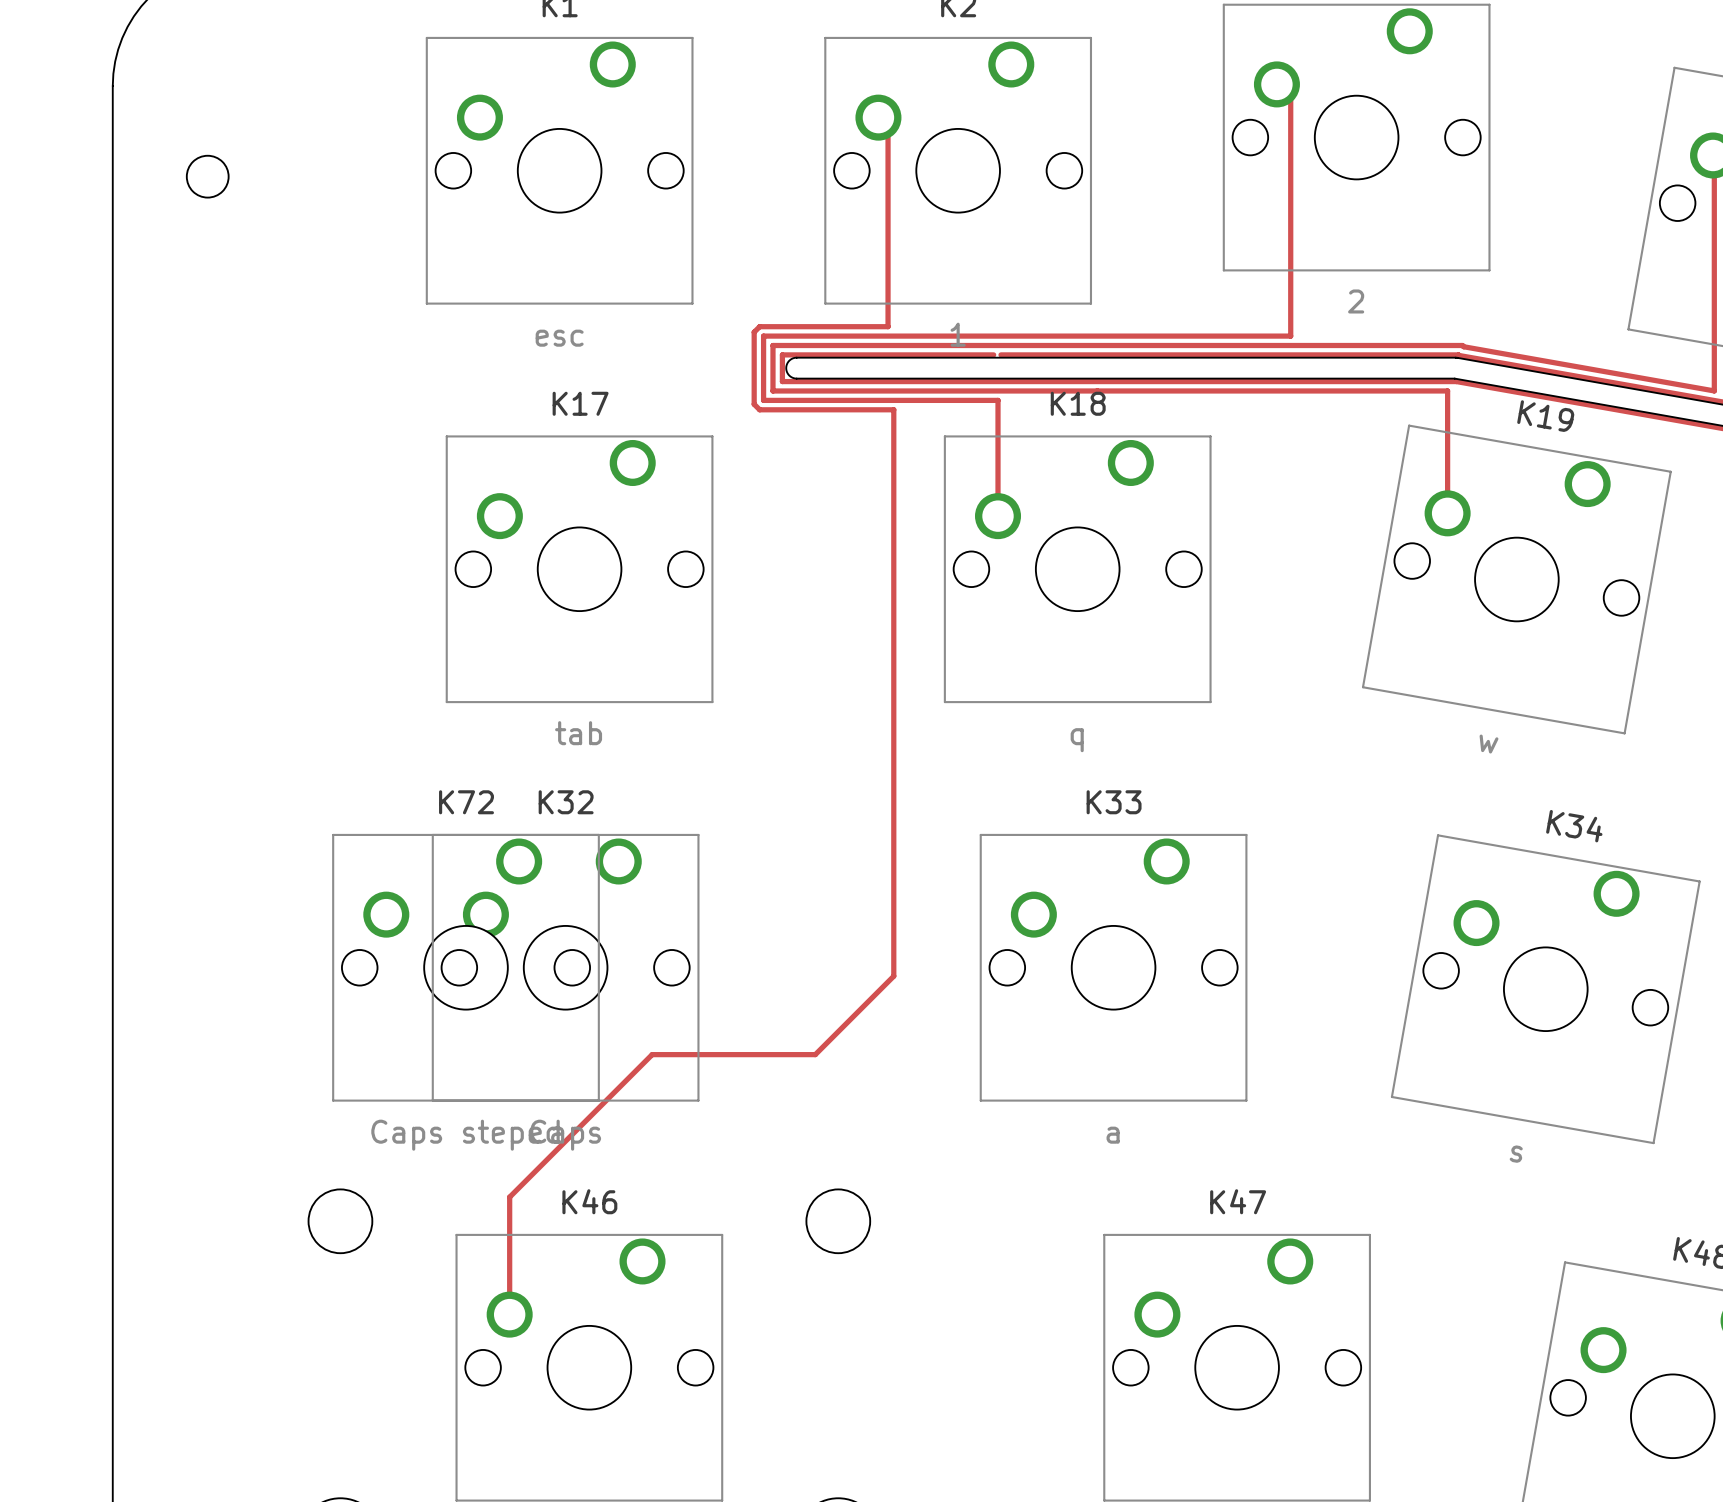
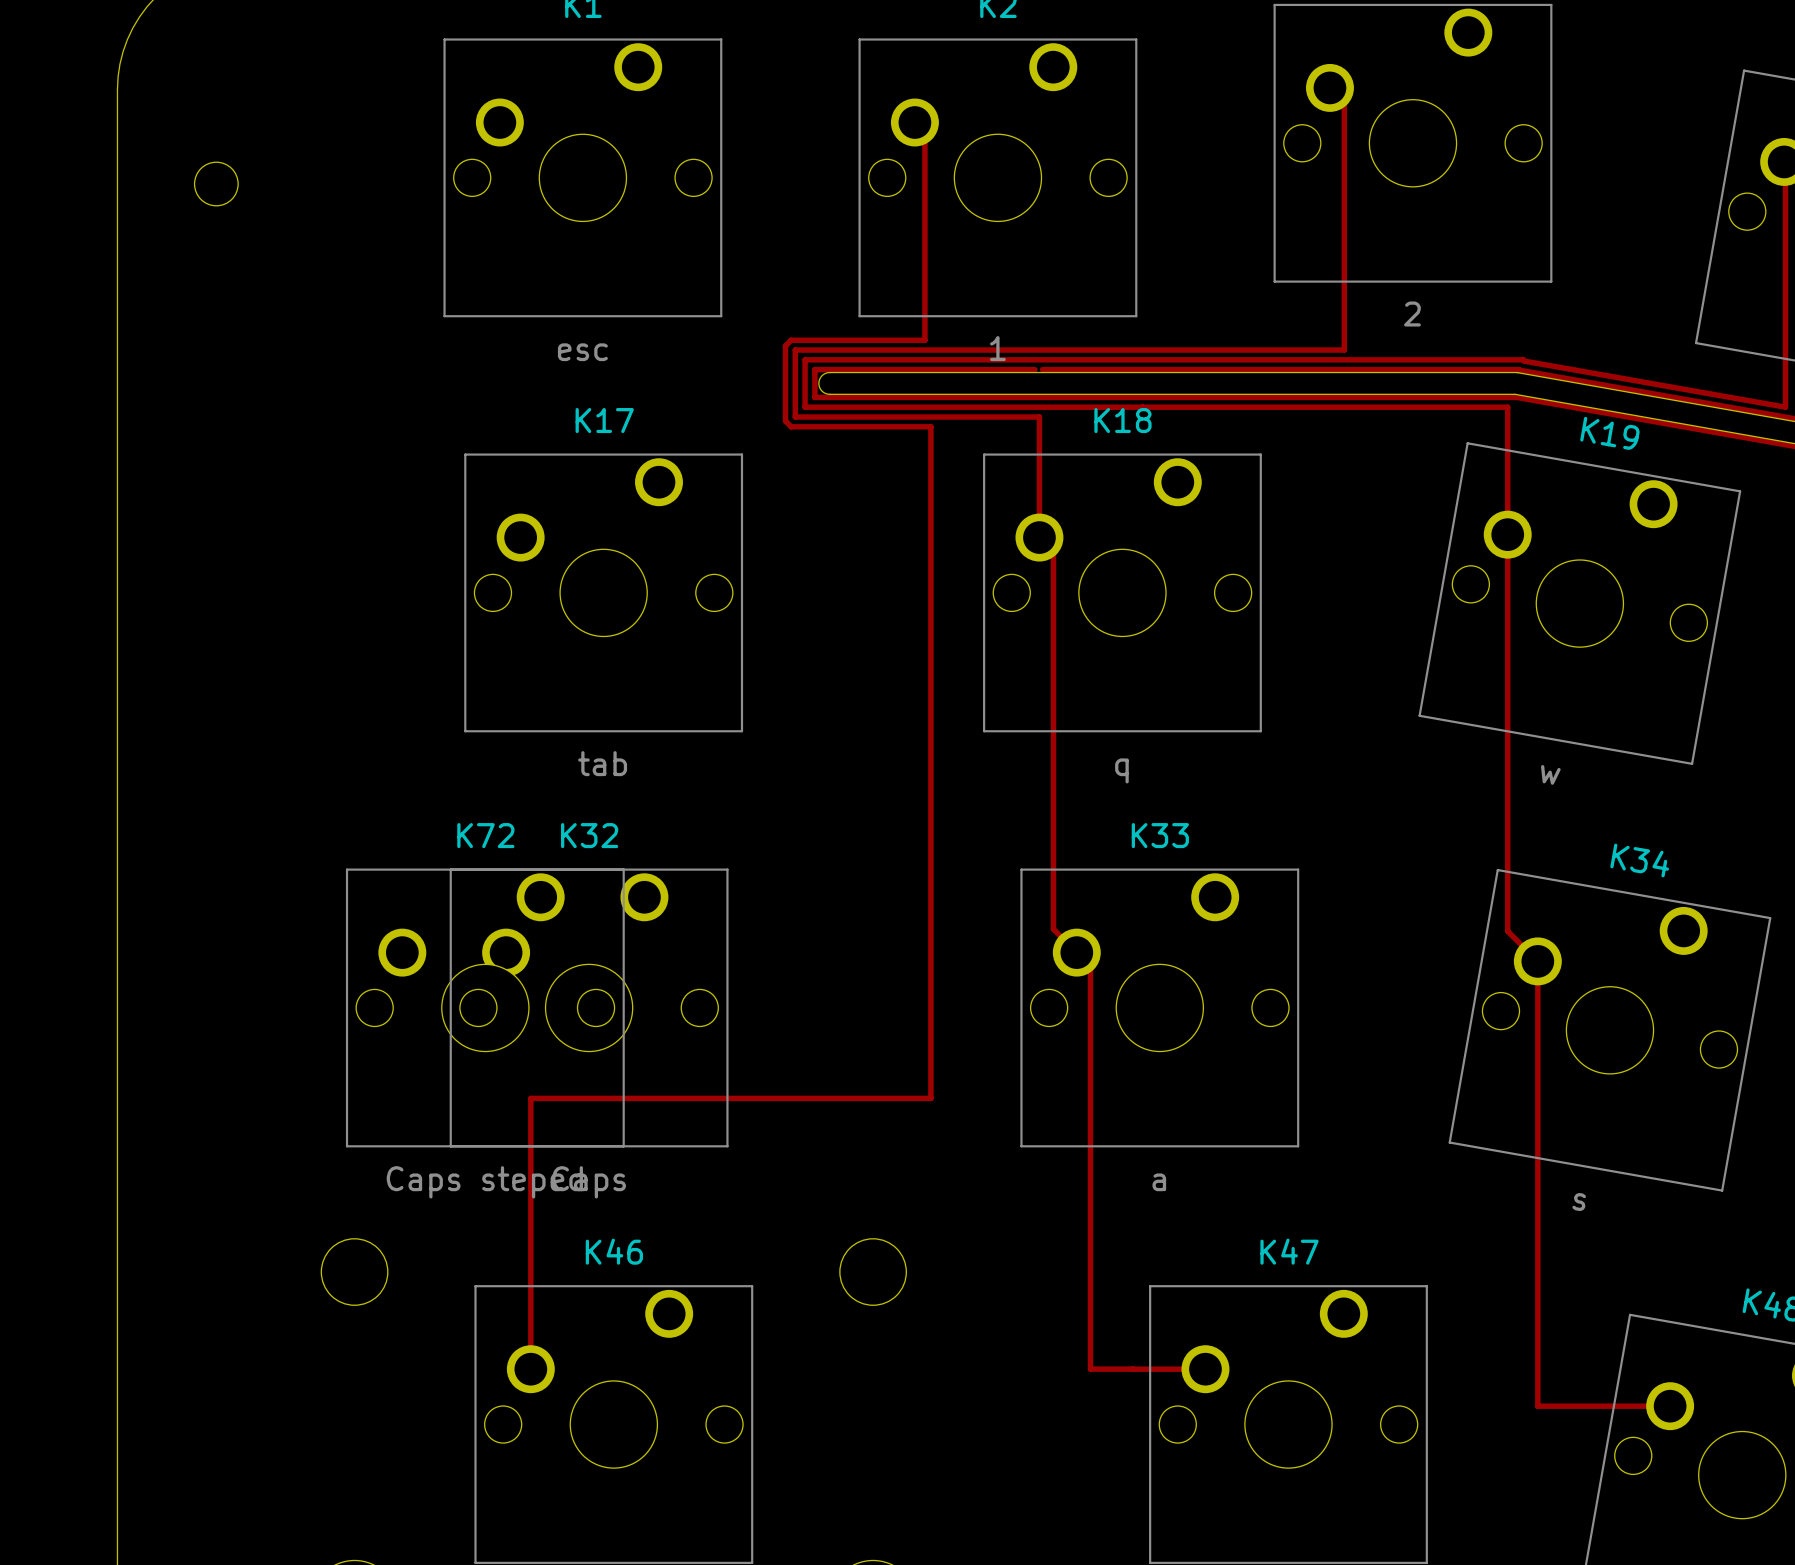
track: none -> (1507, 534) (1507, 931) (1537, 961) (1537, 1406) (1670, 1406) (1667, 1409)
track: none -> (1039, 537) (1053, 537) (1053, 929) (1076, 952) (1090, 952) (1090, 1369) (1205, 1369)
track: (893, 976) (815, 1054) -> (930, 1016) (930, 1098) (849, 1098)
track: (652, 1054) (509, 1197) -> (679, 1098) (530, 1098) (530, 1246)

